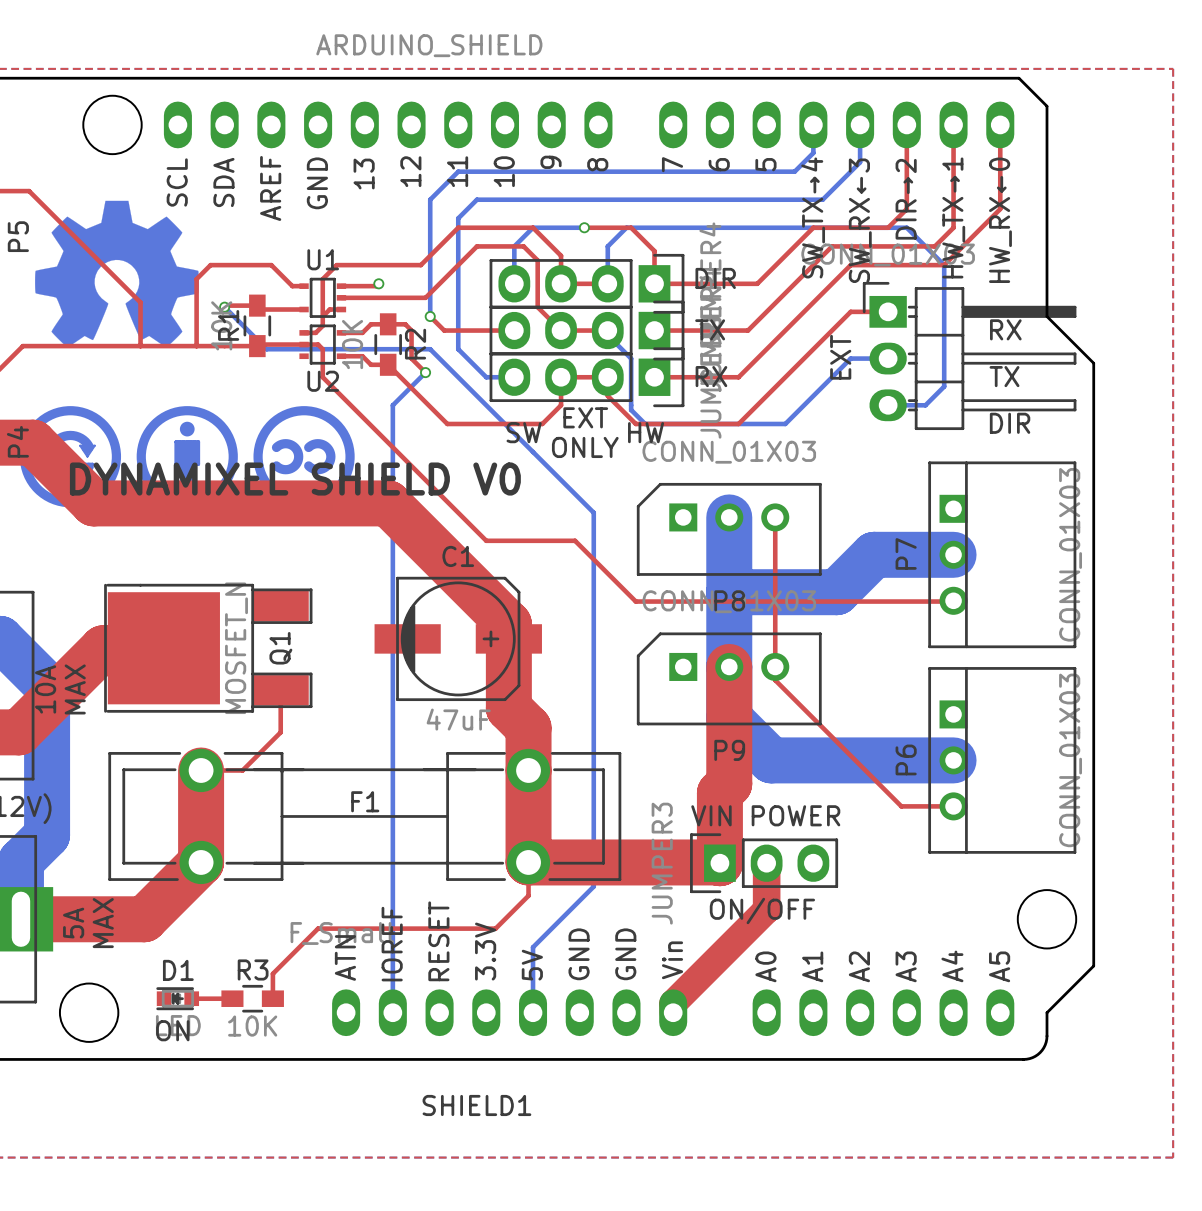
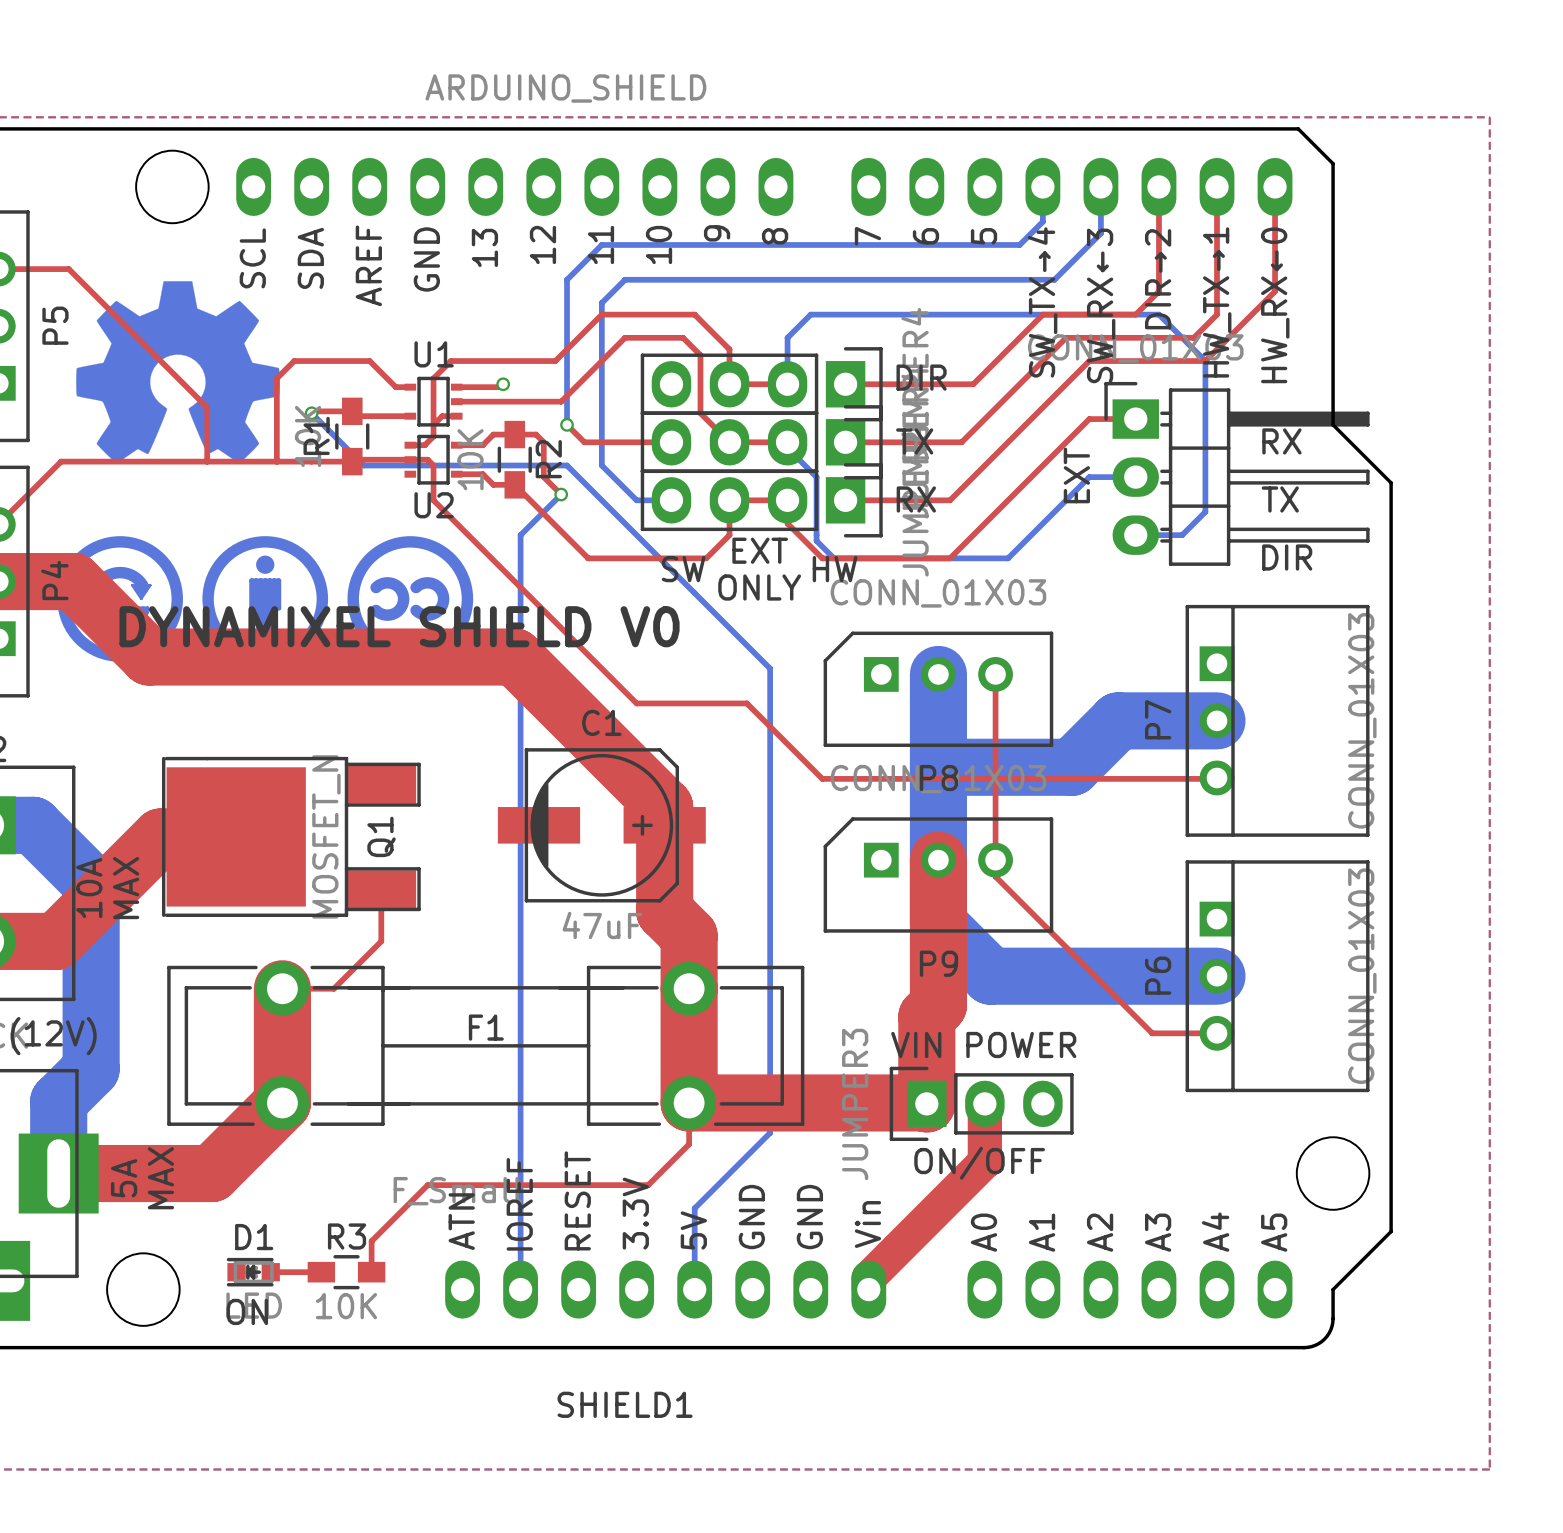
bottom track: (584, 227) (533, 227) (514, 246) (514, 283) -> none
top track: (584, 227) (631, 227) (654, 251) (654, 283) -> none
via: (584, 227) -> none

